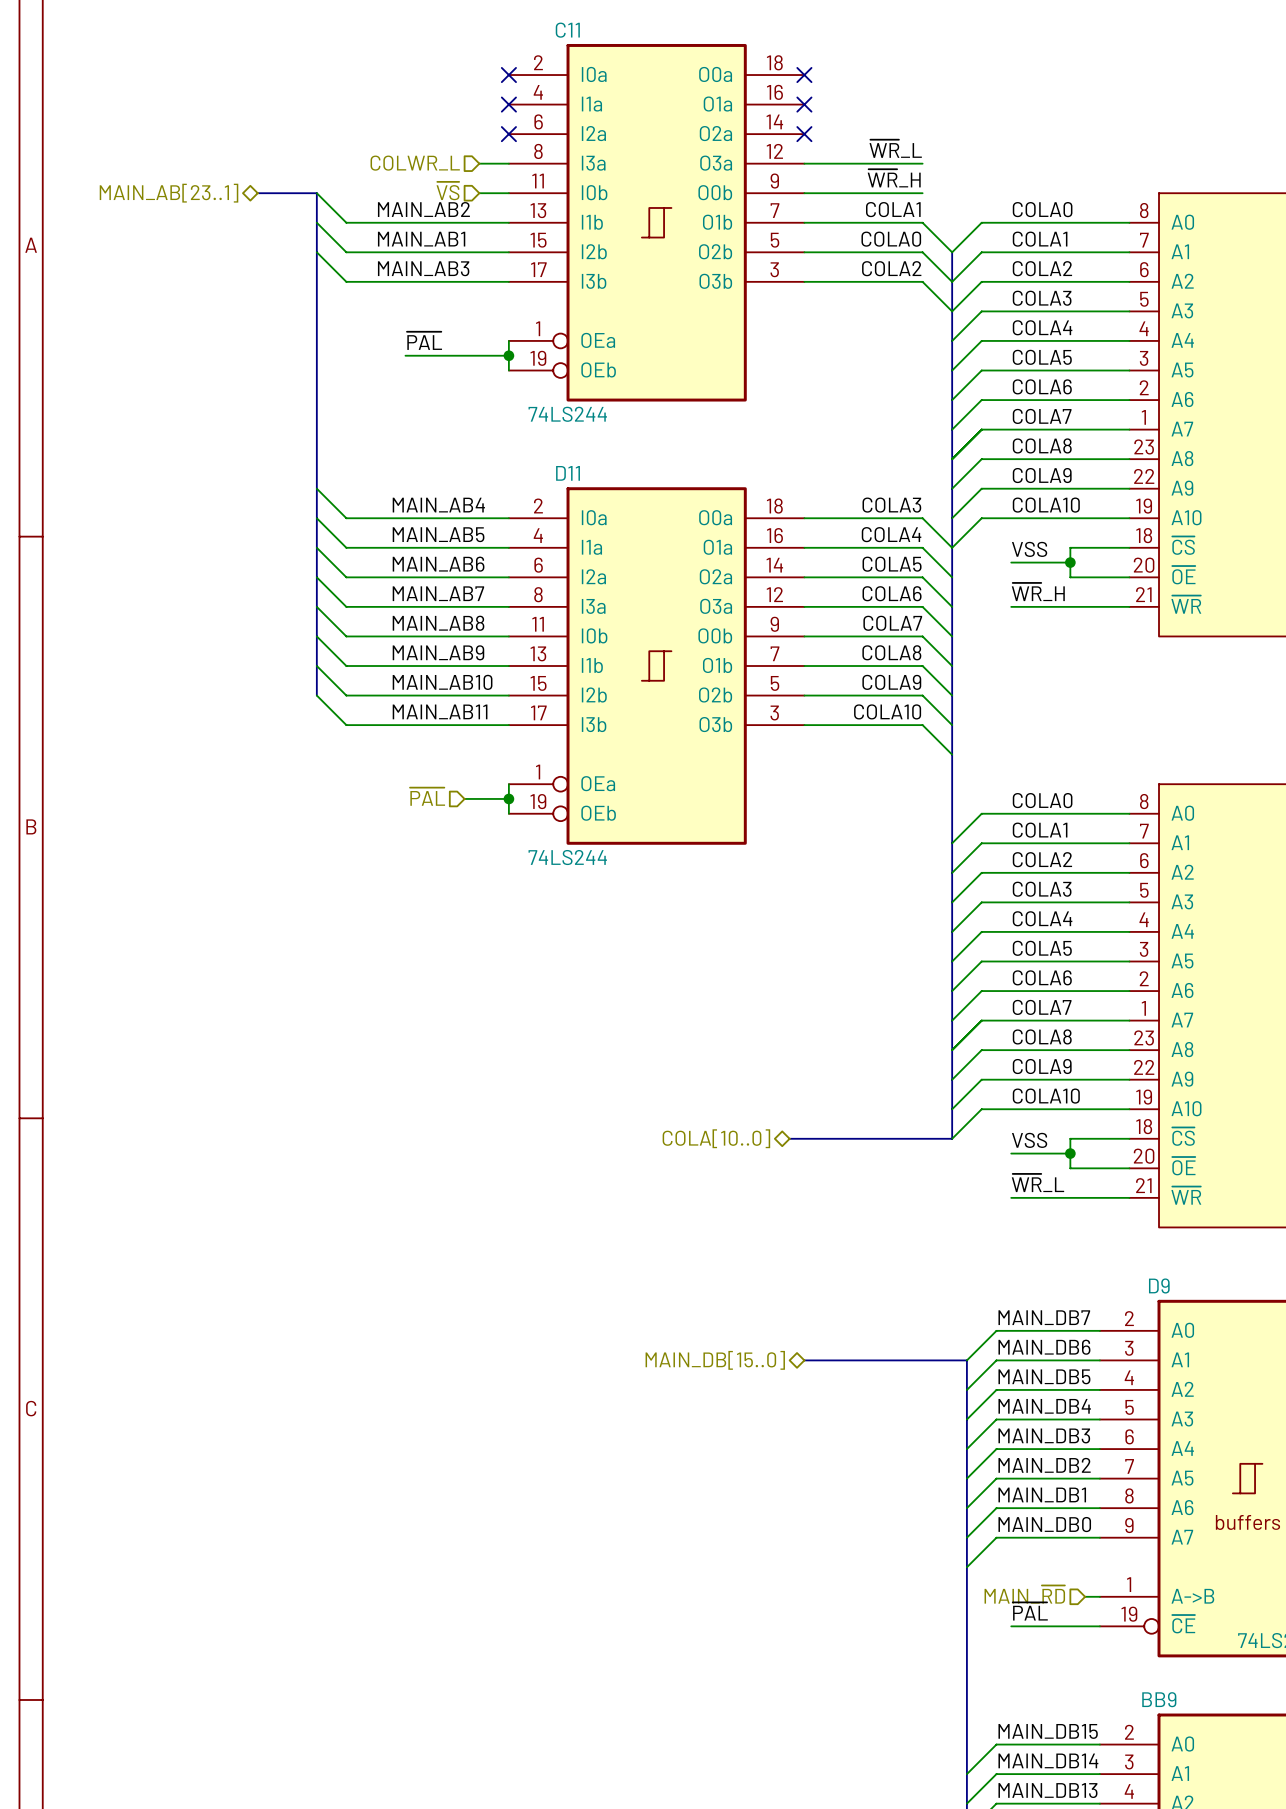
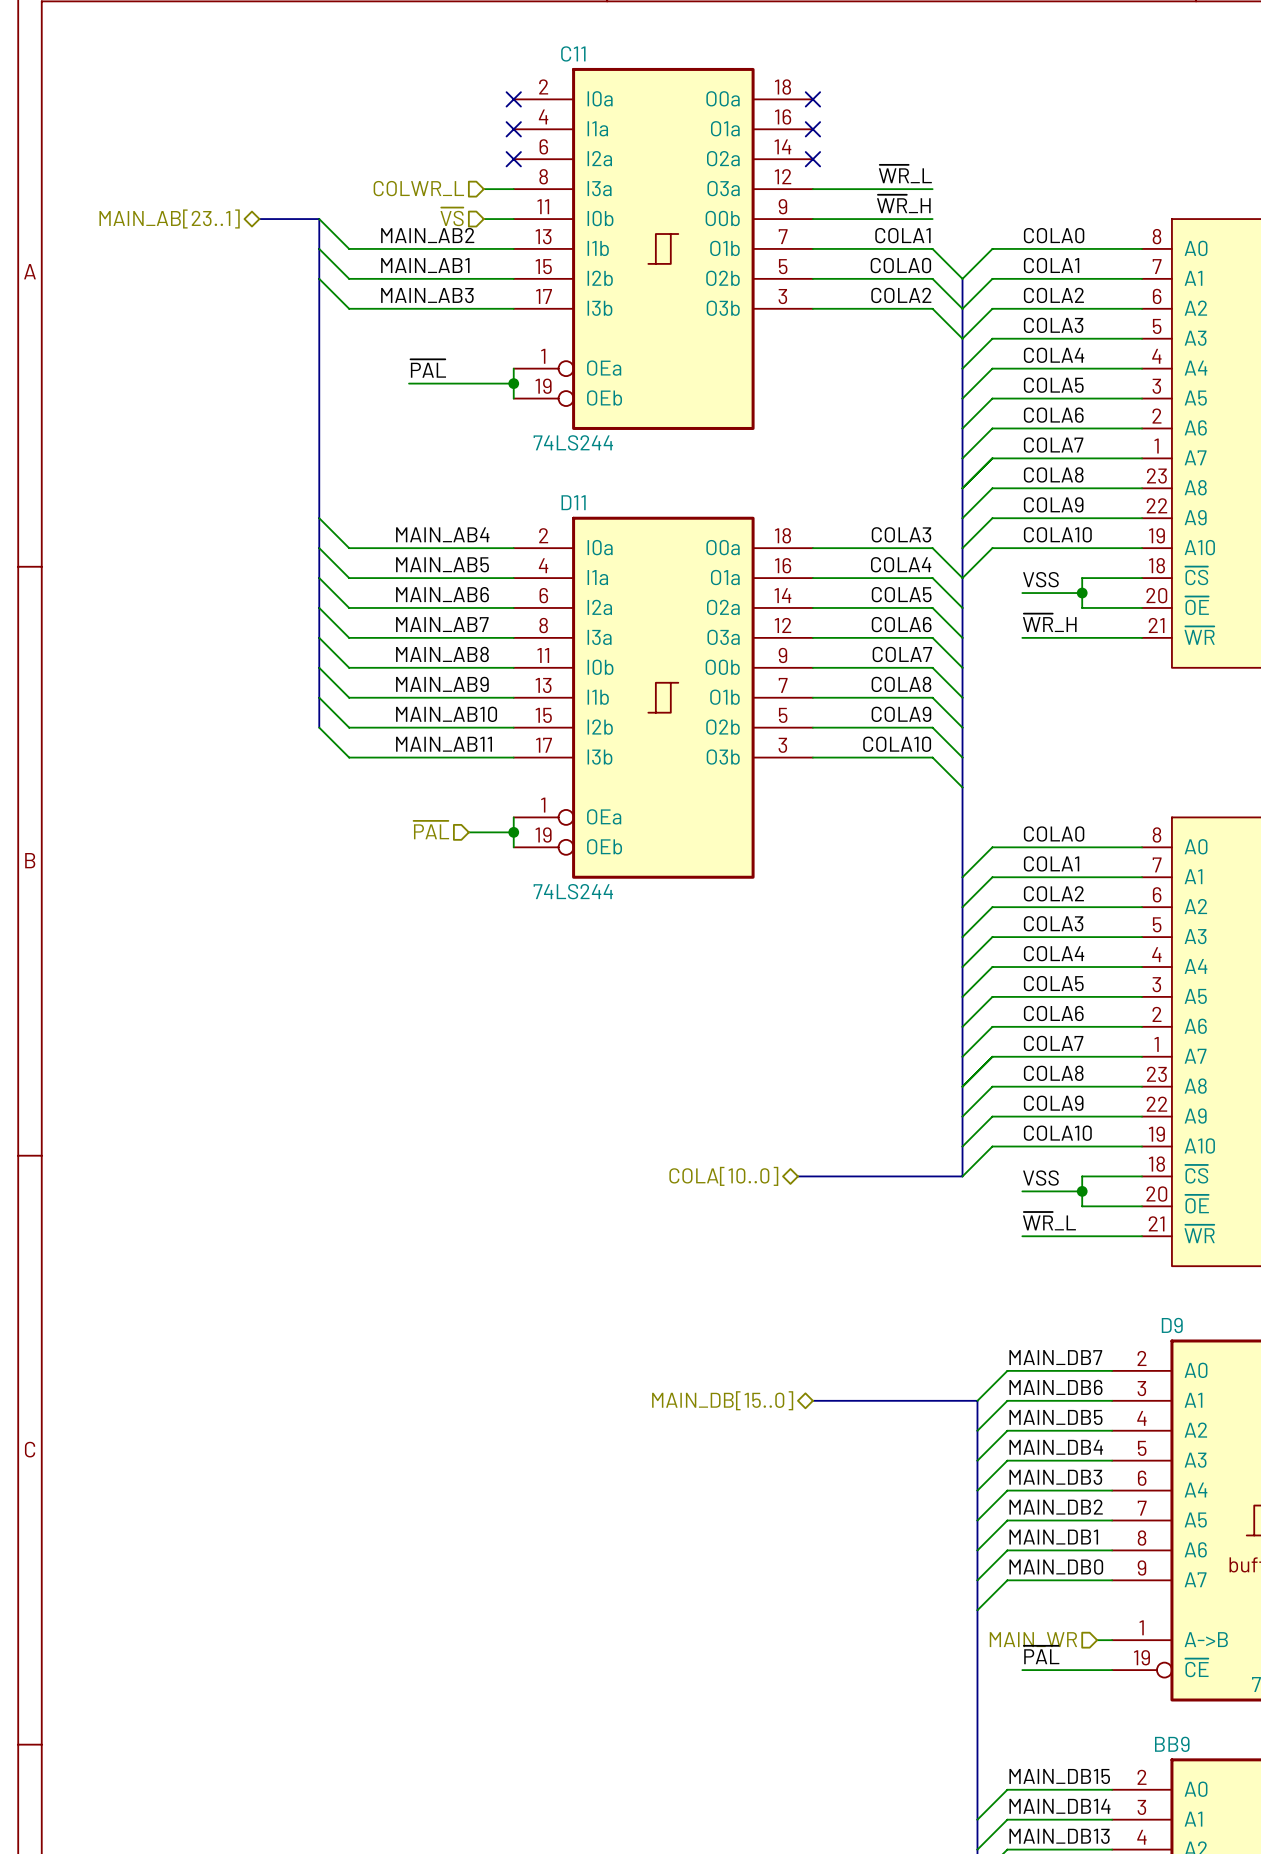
hierarchical label: MAIN_~{RD} (1024, 1594) -> MAIN_WR (1033, 1639)

